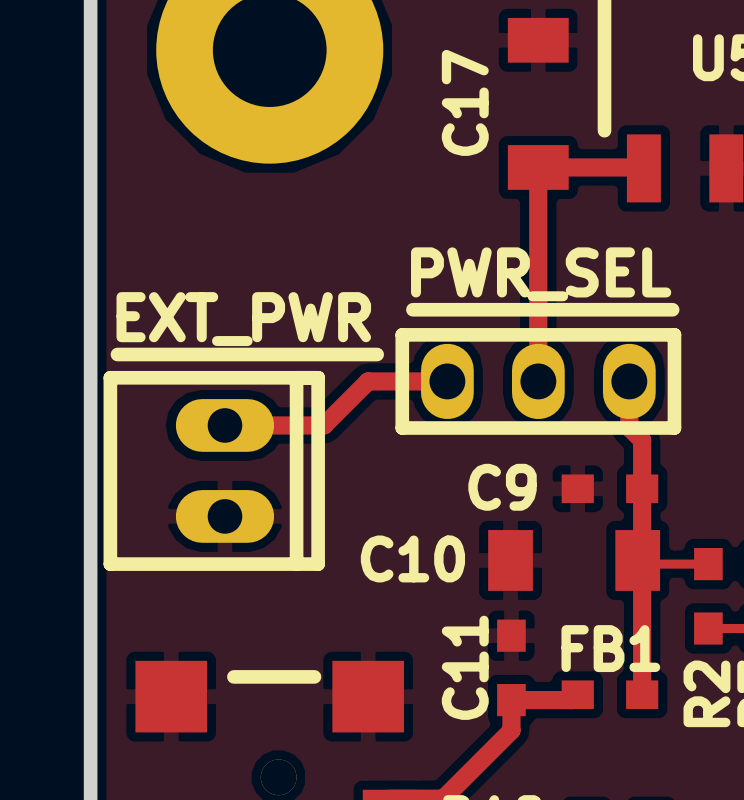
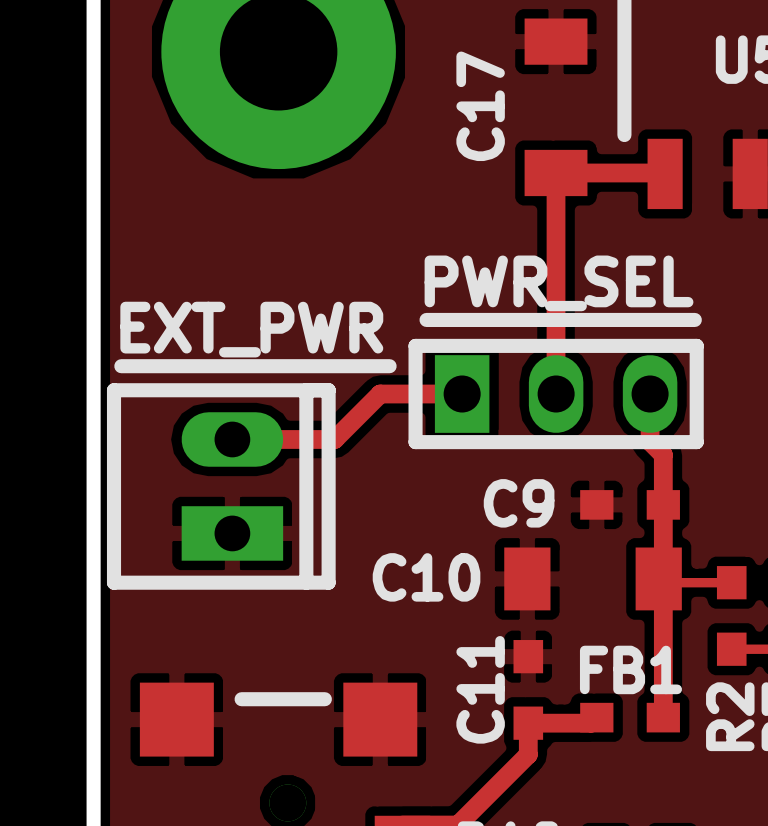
part footprint: [395, 328, 682, 435] -> [408, 338, 704, 450]
part footprint: [103, 370, 325, 571] -> [106, 383, 336, 590]

